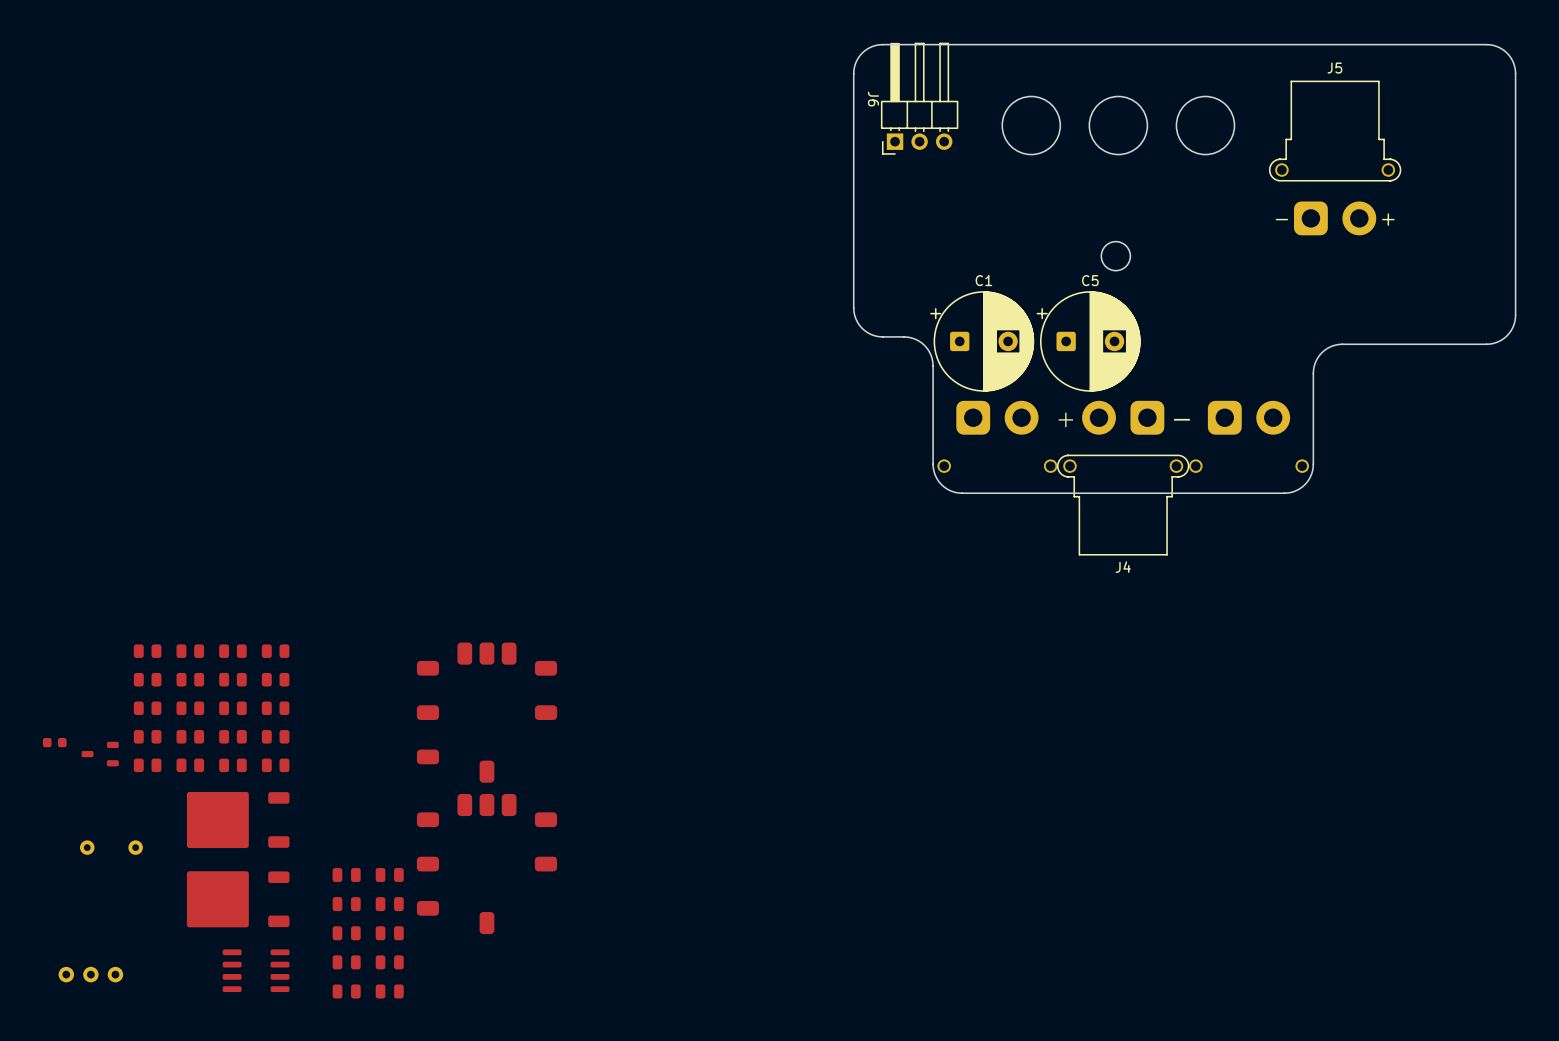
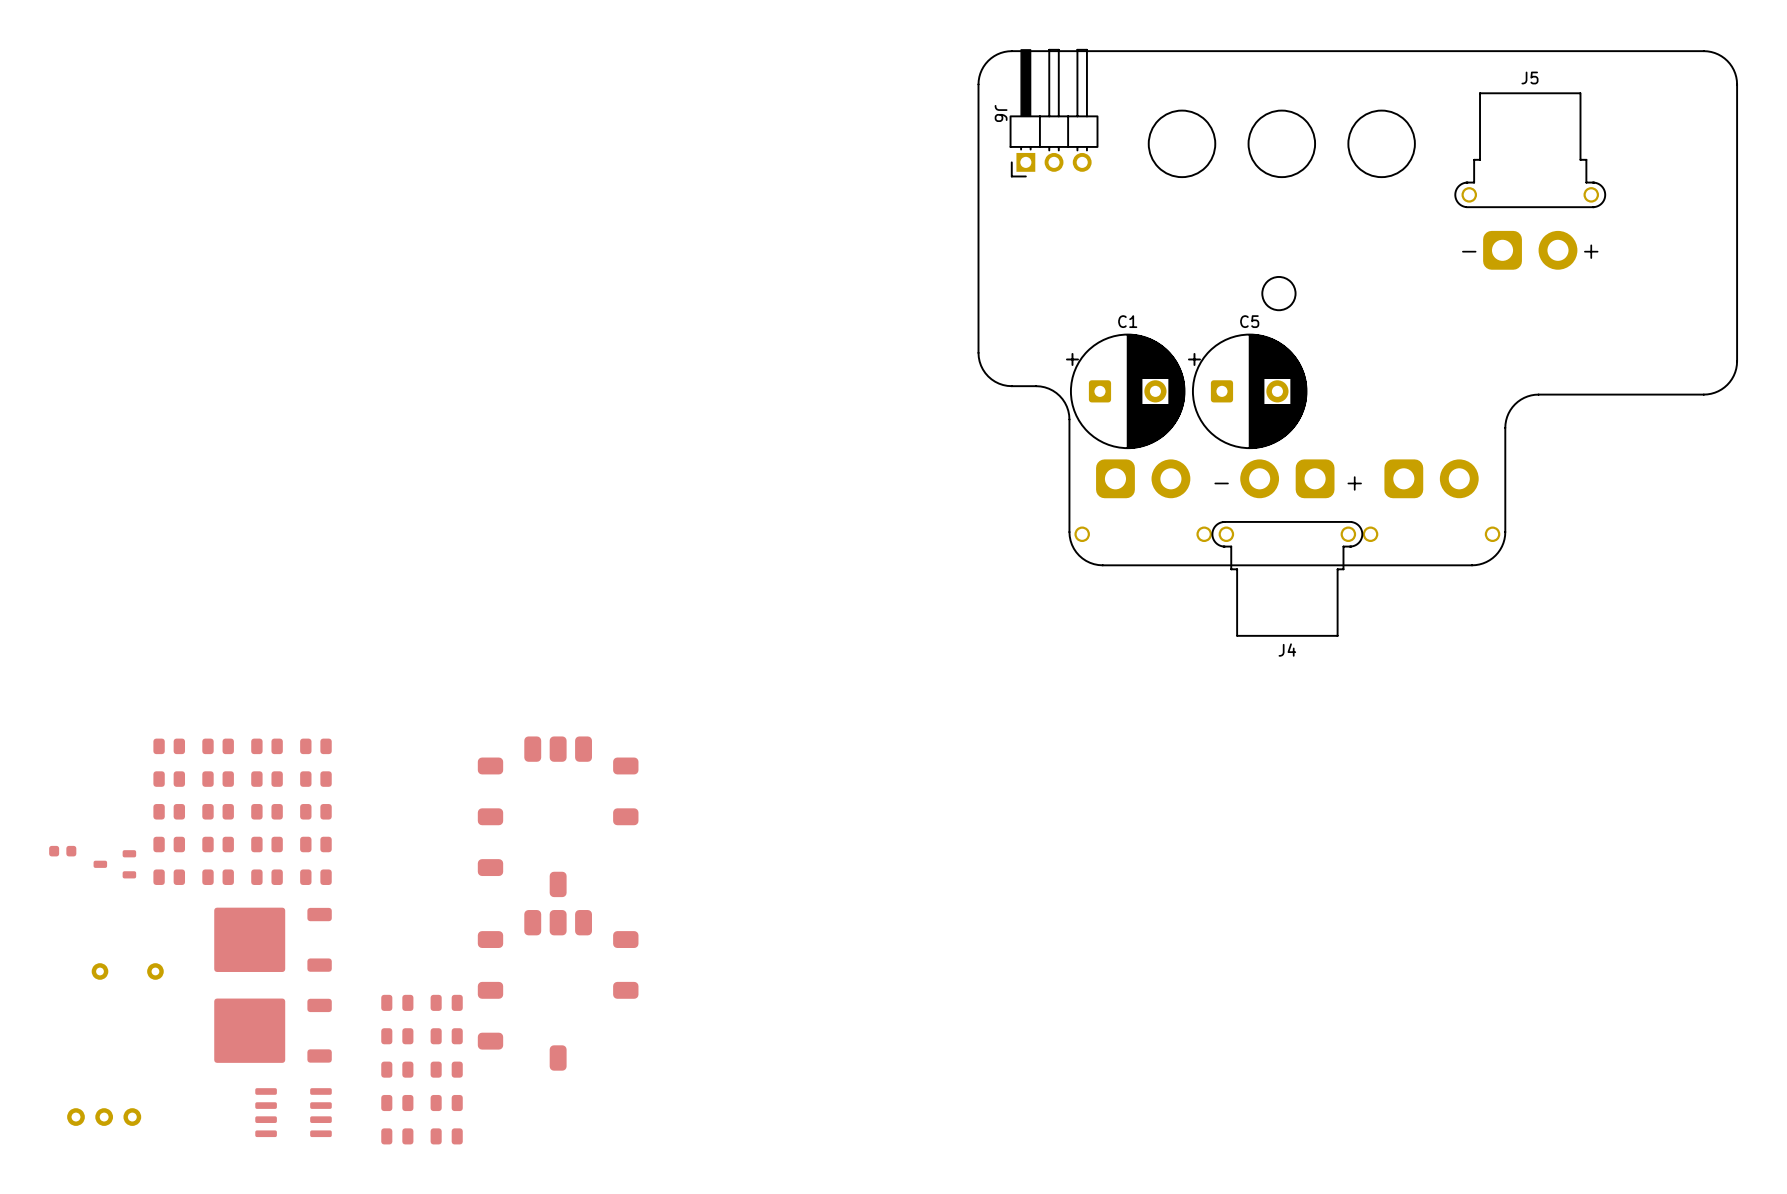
J4 text: ＋ (1065, 419) -> - (1221, 483)
J4 text: ー (1181, 419) -> + (1354, 483)

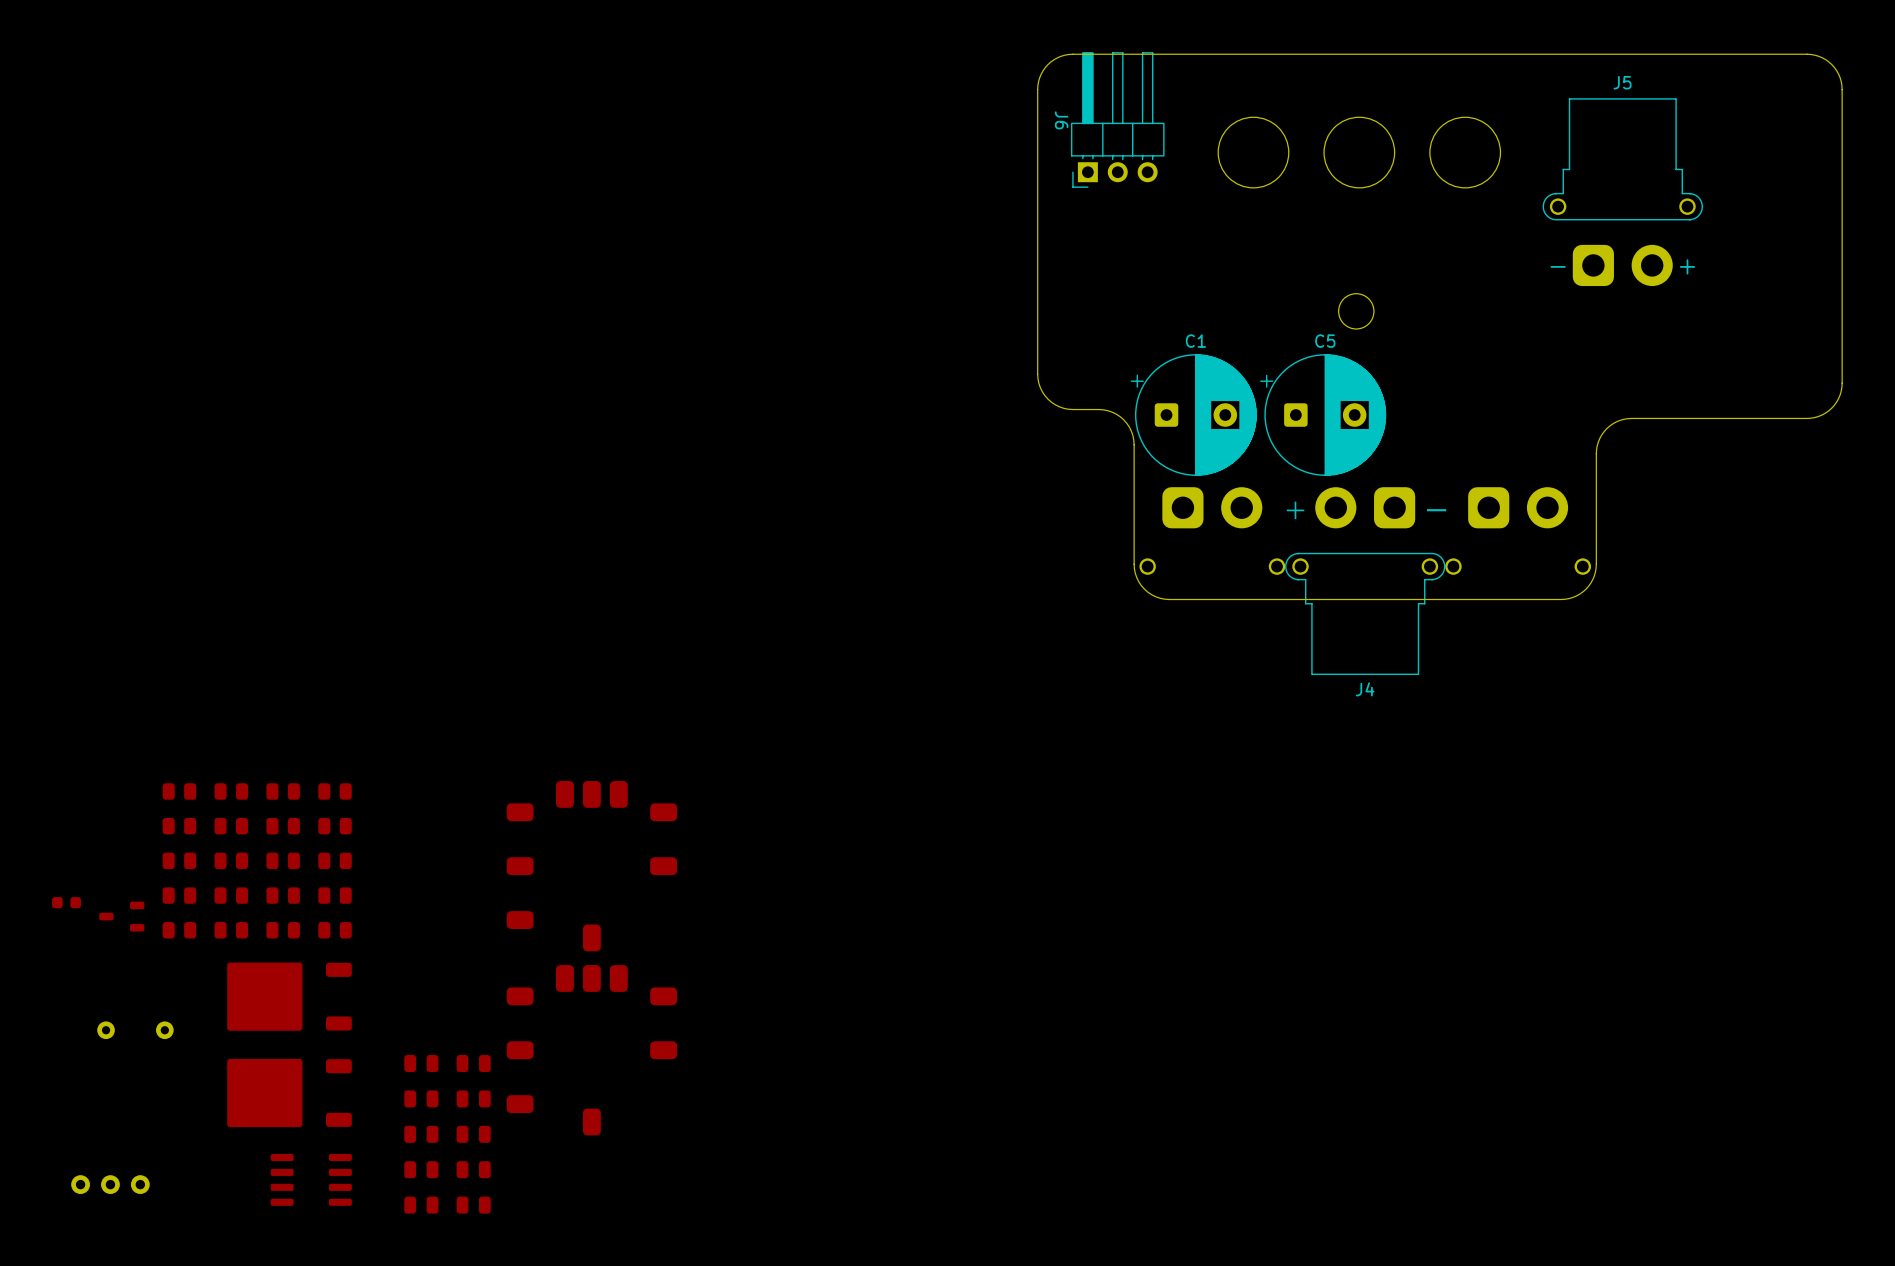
J4 text: - (1221, 483) -> ＋ (1295, 510)
J4 text: + (1354, 483) -> ー (1436, 510)

